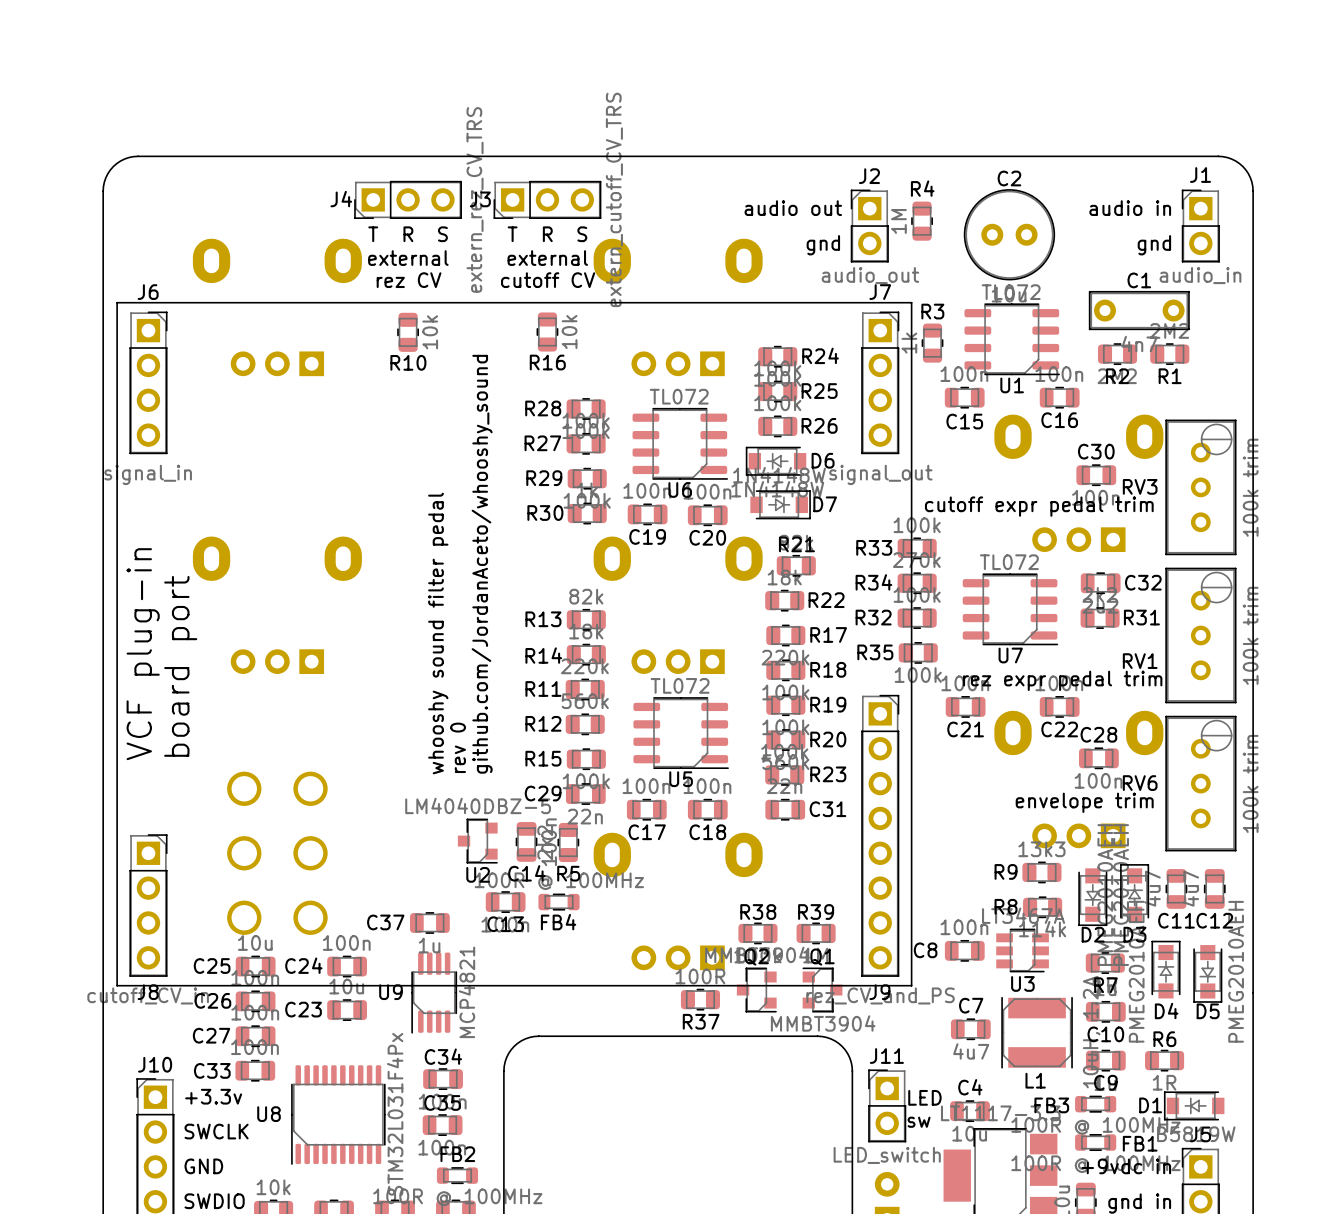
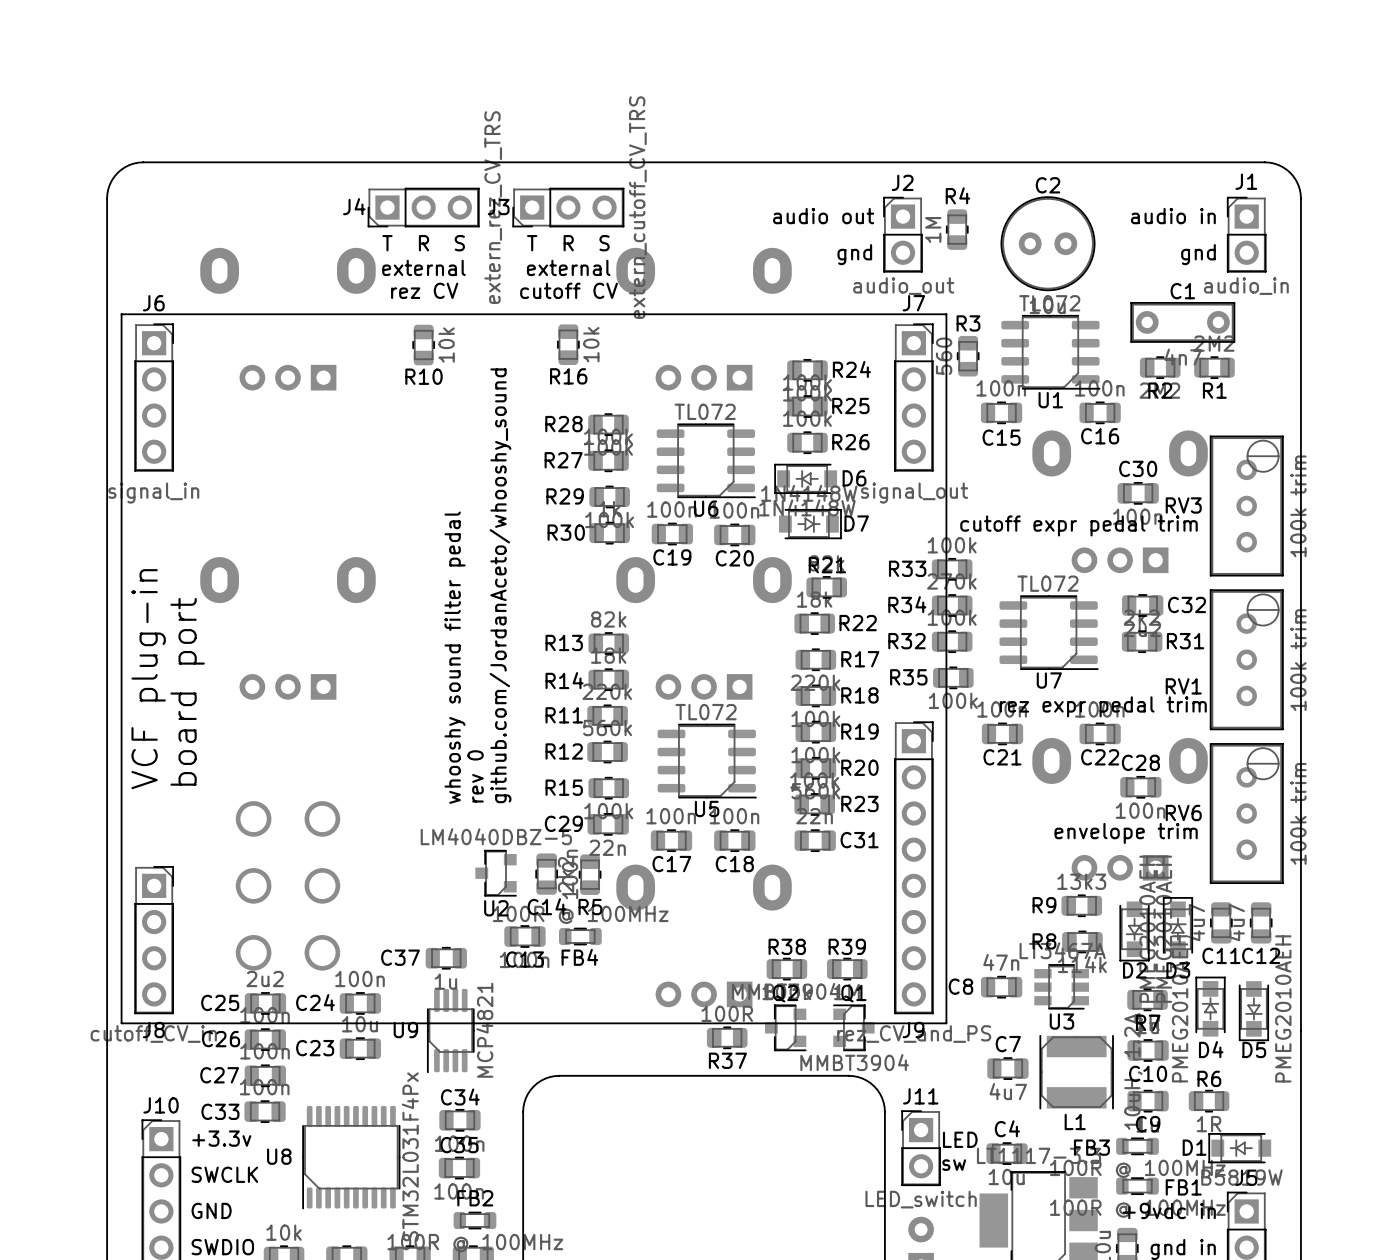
R3 value: 1k (909, 343) -> 560 (944, 356)
C8 value: 100n (964, 927) -> 47n (1001, 962)
C25 value: 10u (255, 942) -> 2u2 (265, 978)

